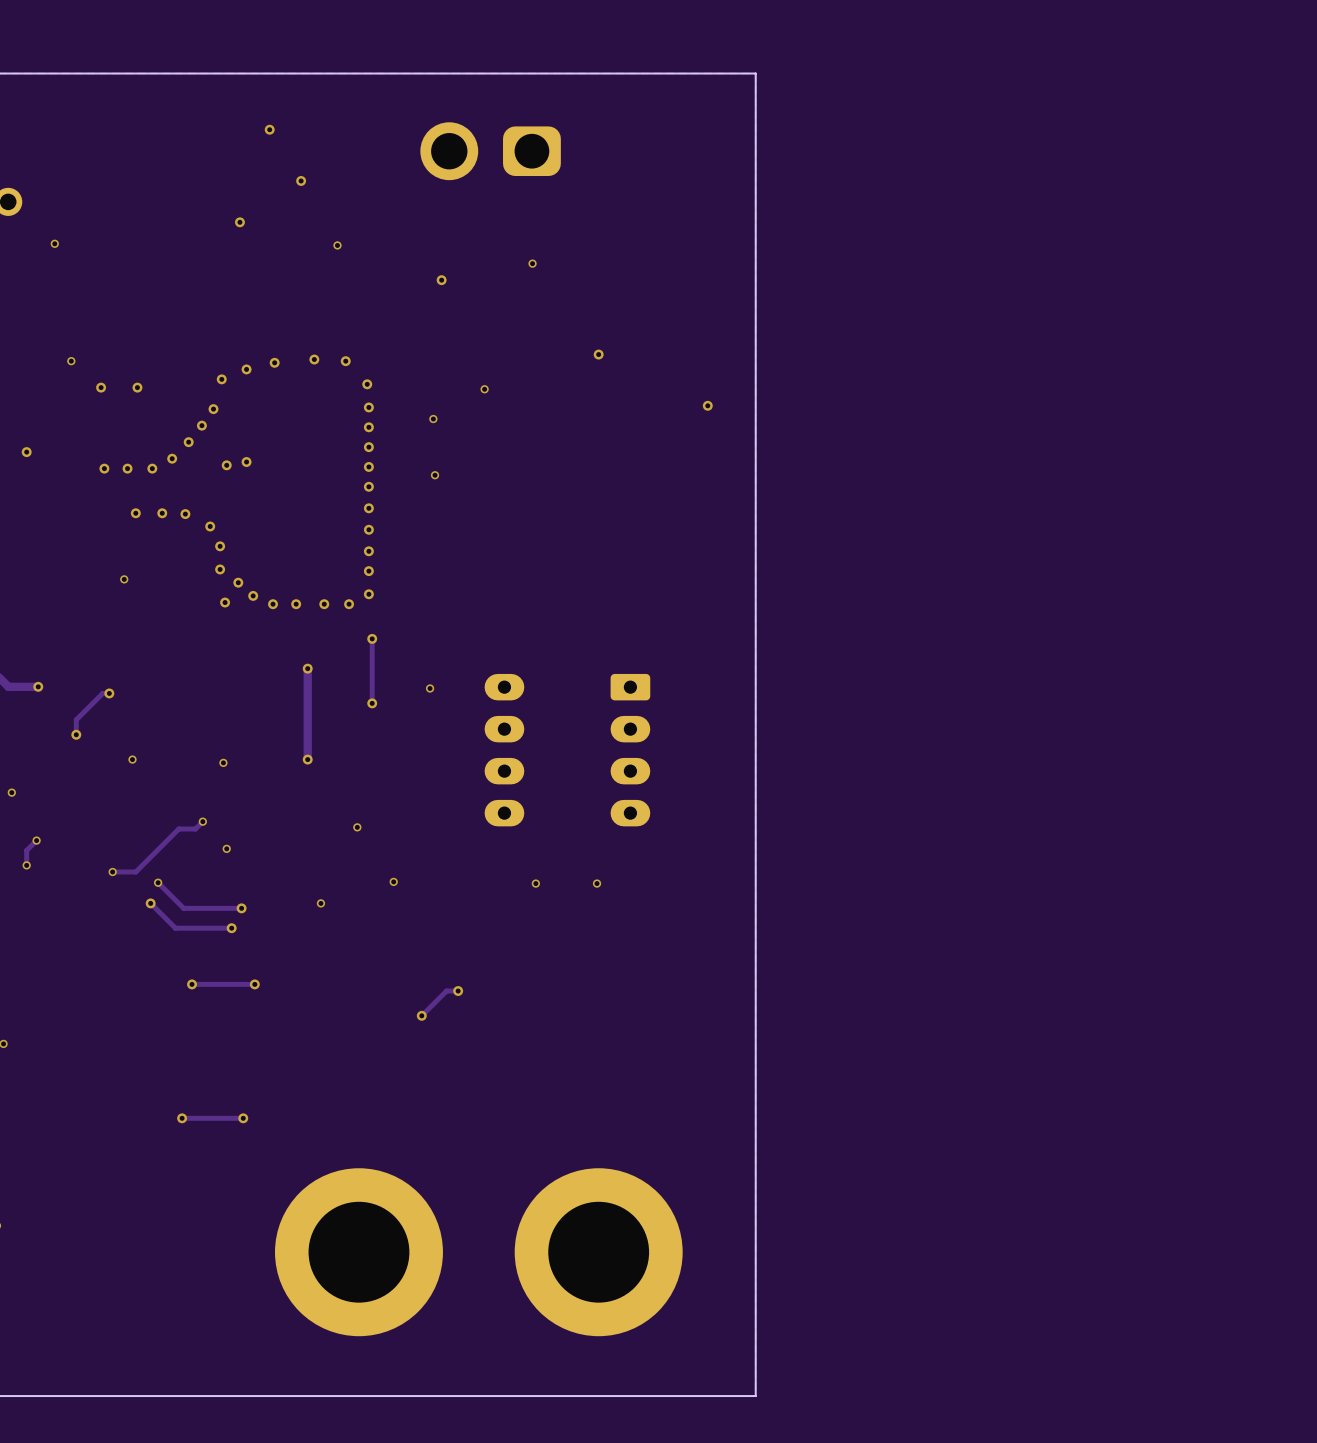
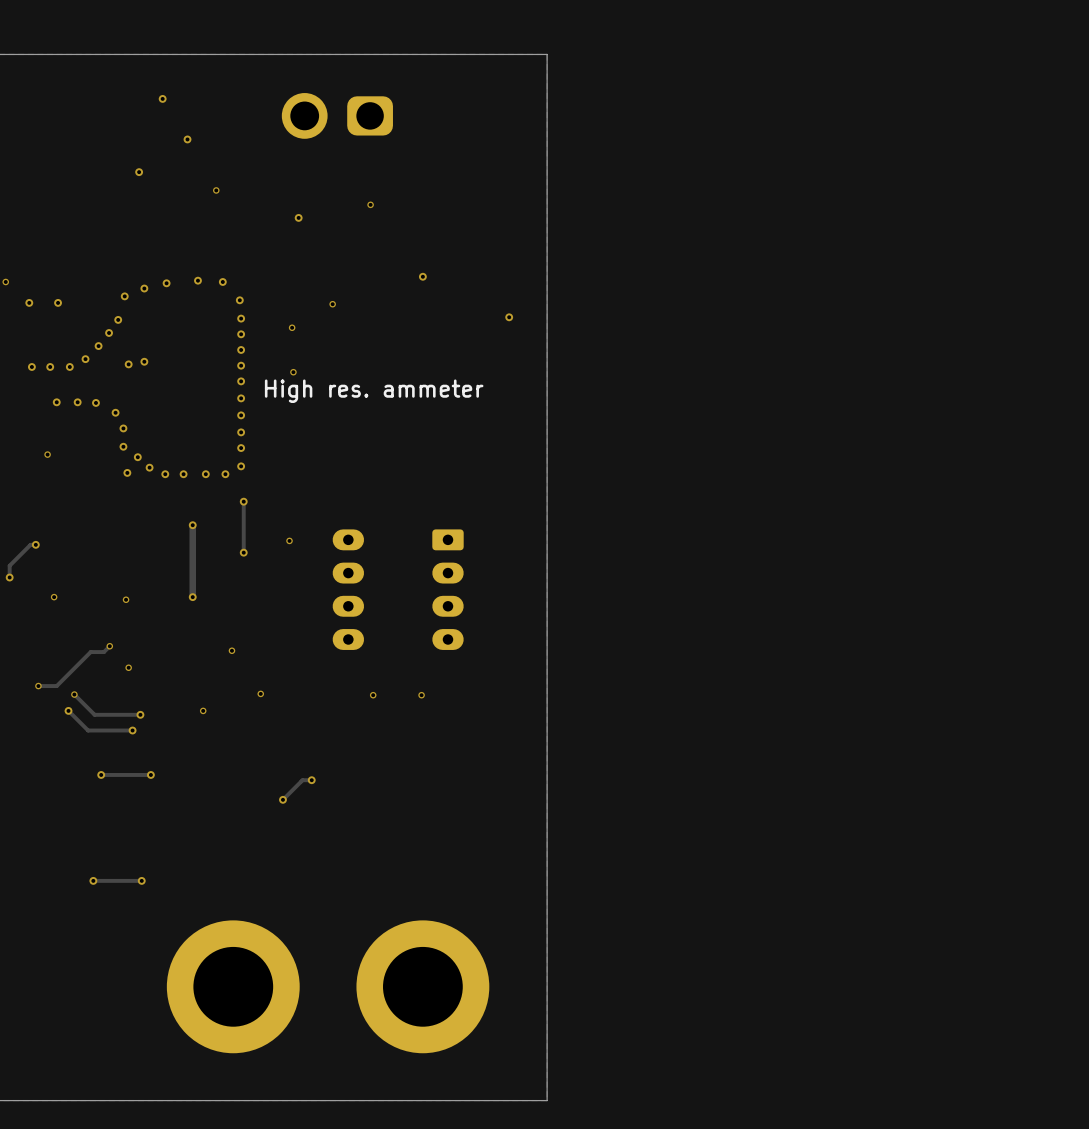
text: none -> High res. ammeter (374, 391)

